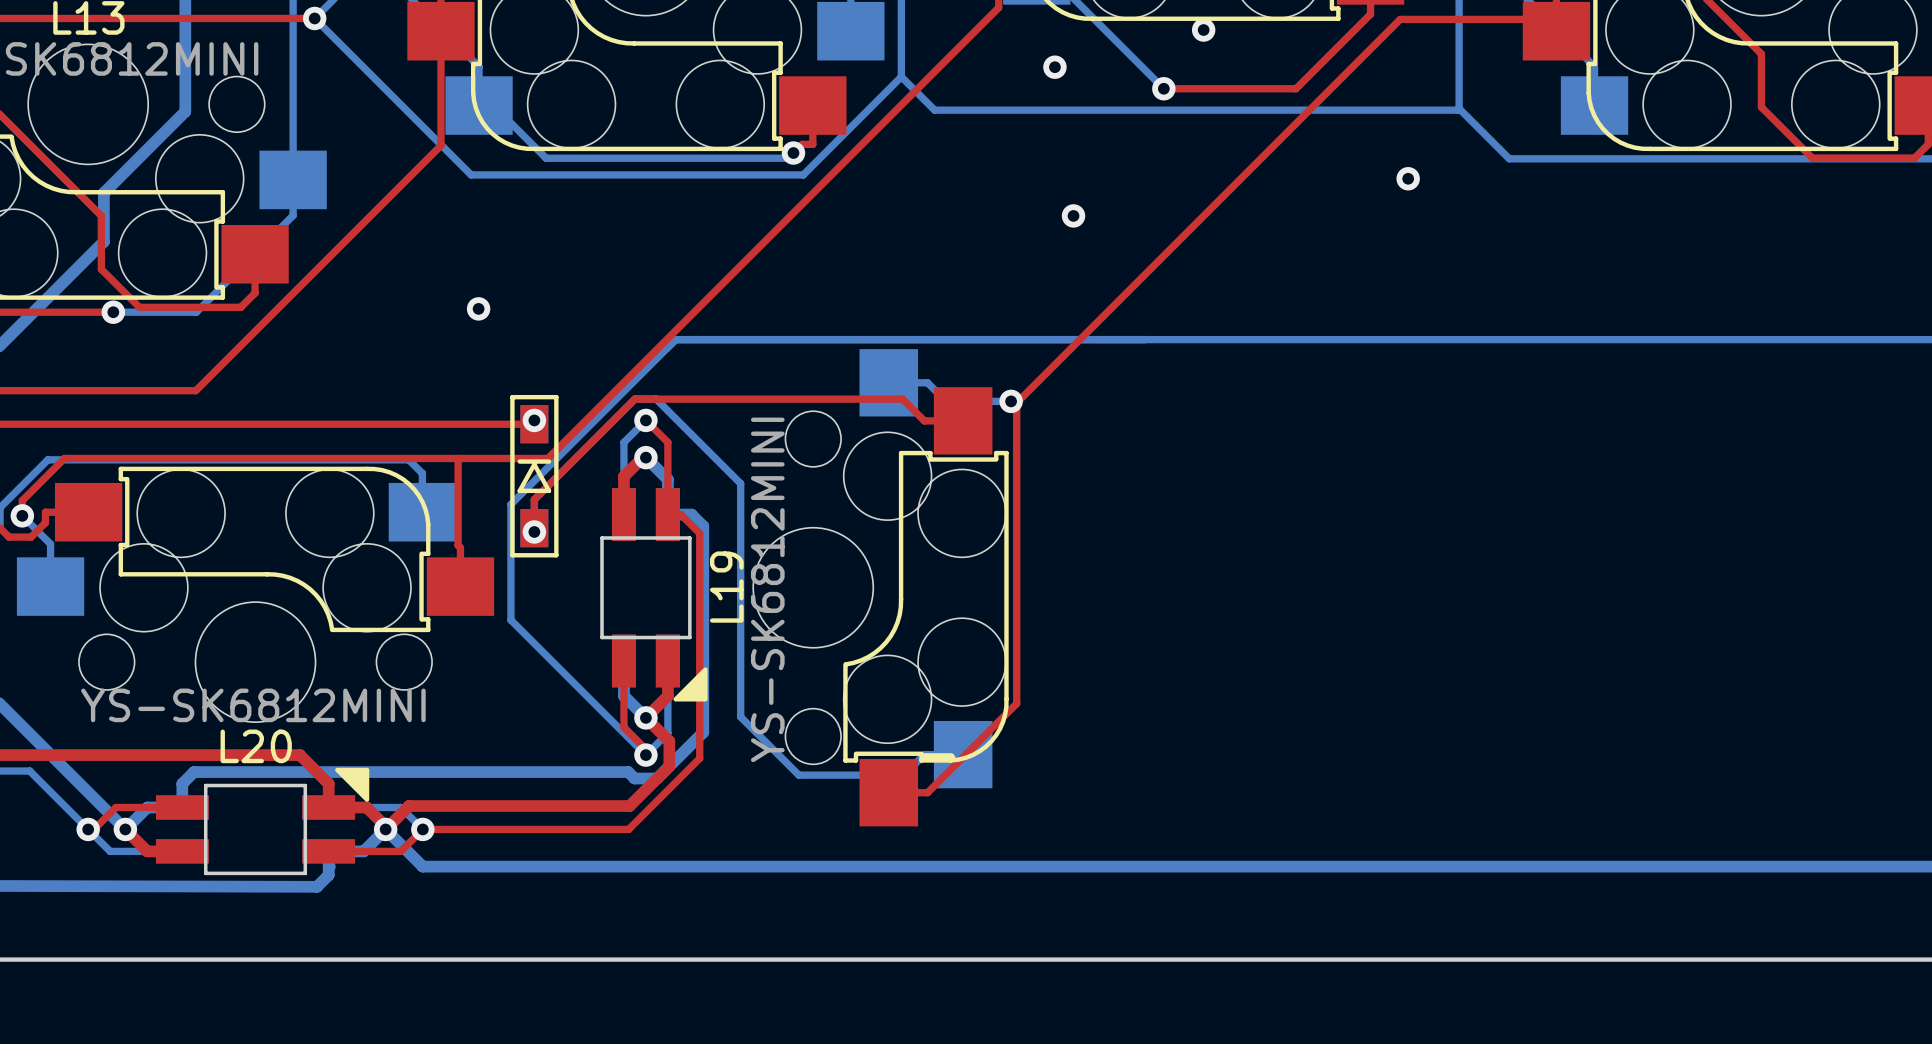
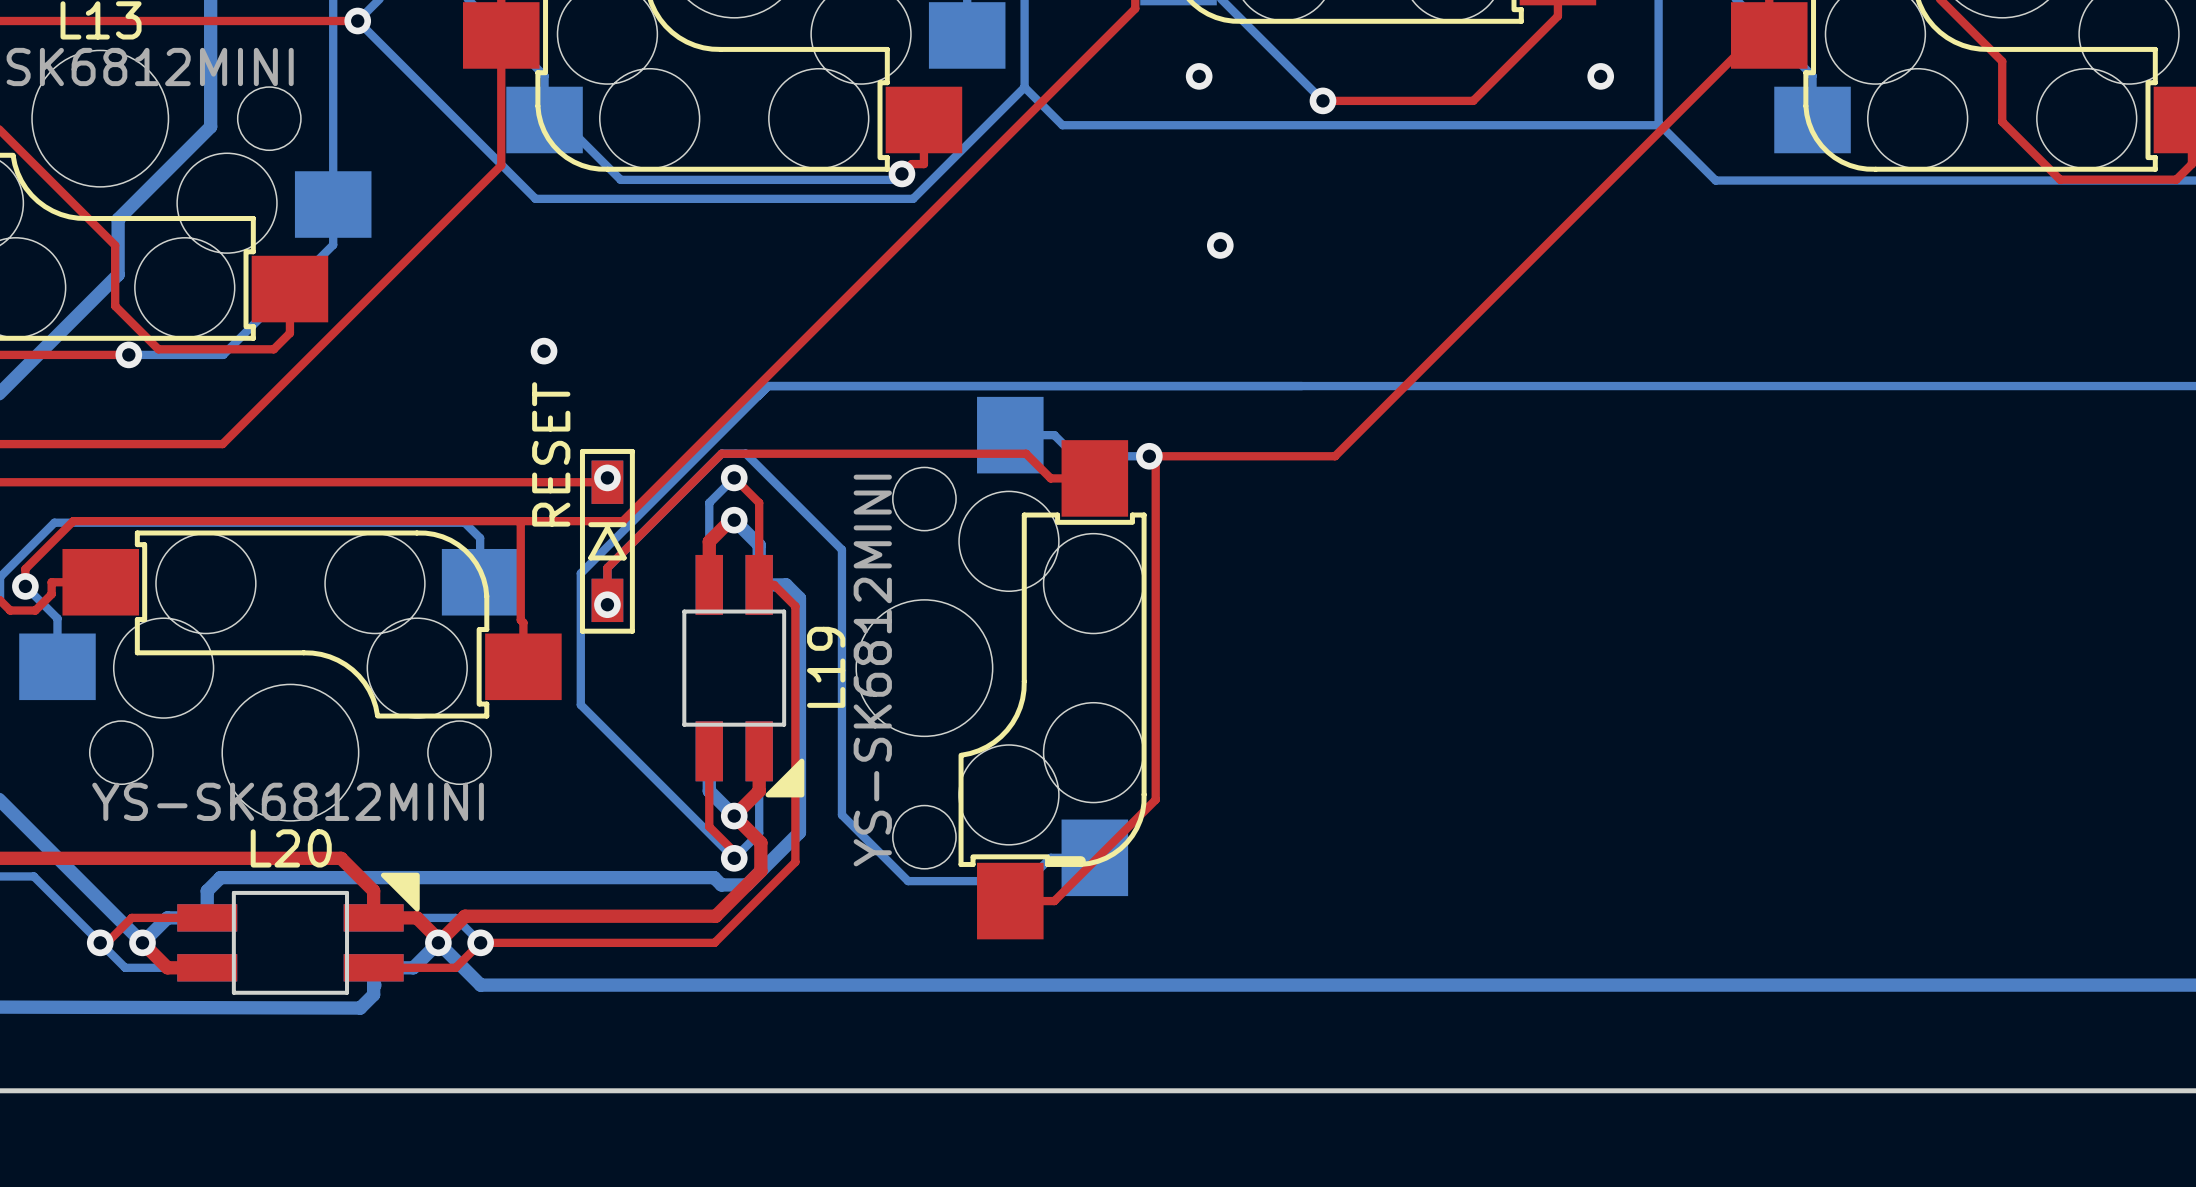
top track: (1556, 19) (1400, 19) (1018, 401) -> (1769, 22) (1335, 456) (1157, 456)
via: (1203, 30) -> none
via: none -> (1600, 76)
via: (1408, 178) -> none
drawing: none -> [532, 382, 571, 527]

